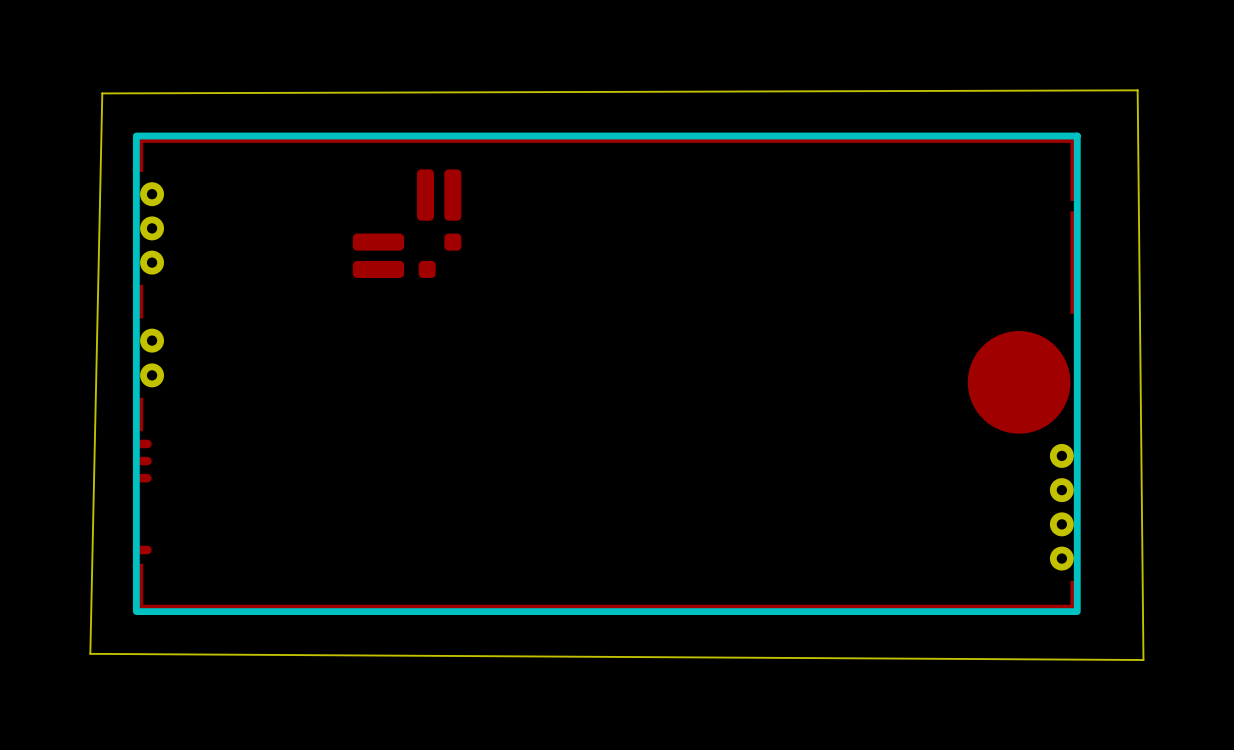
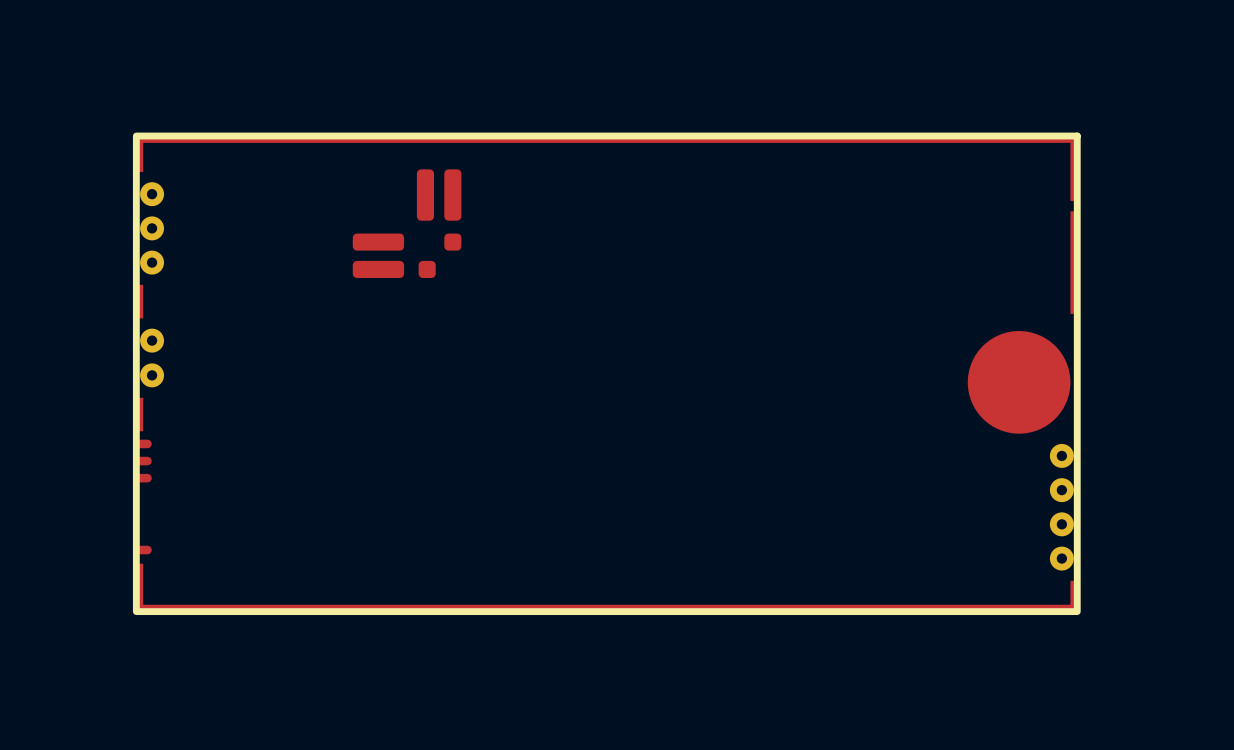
board edge: (1137, 90) (1143, 660) (90, 653) (102, 93) (1137, 90) -> none

